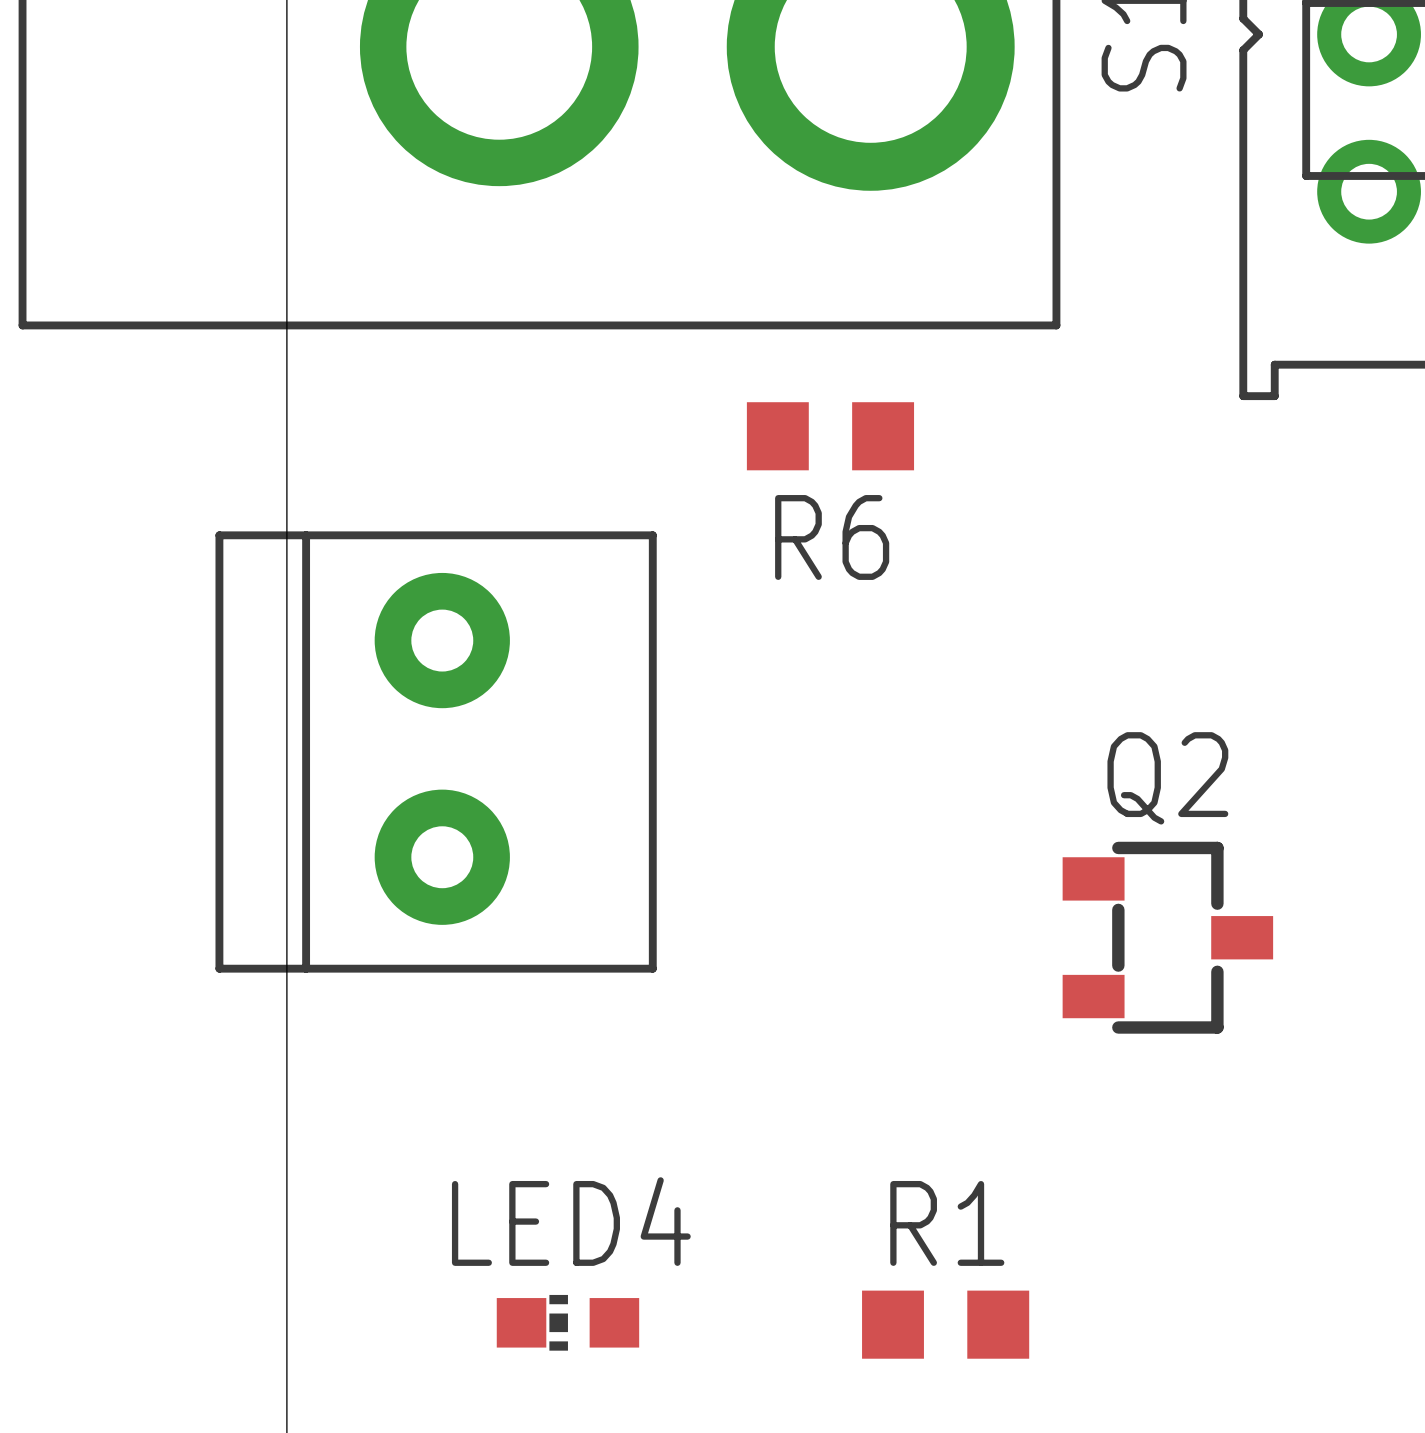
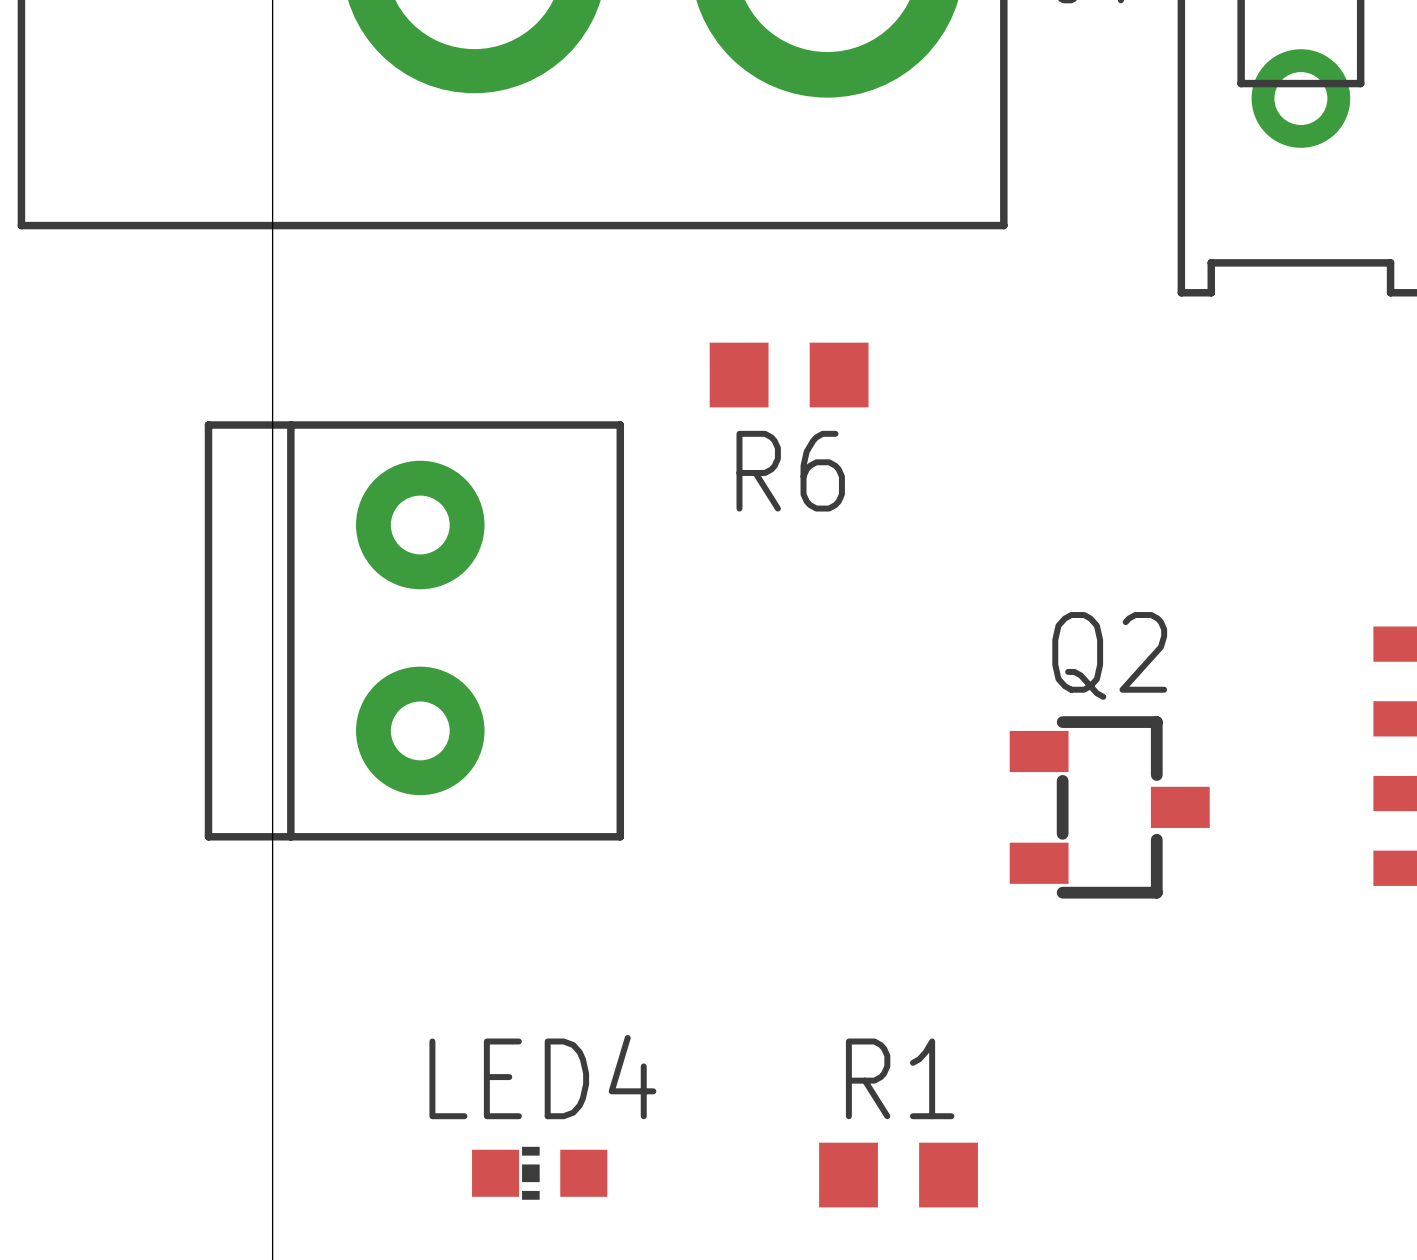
R6 position: (830, 436) -> (789, 375)

